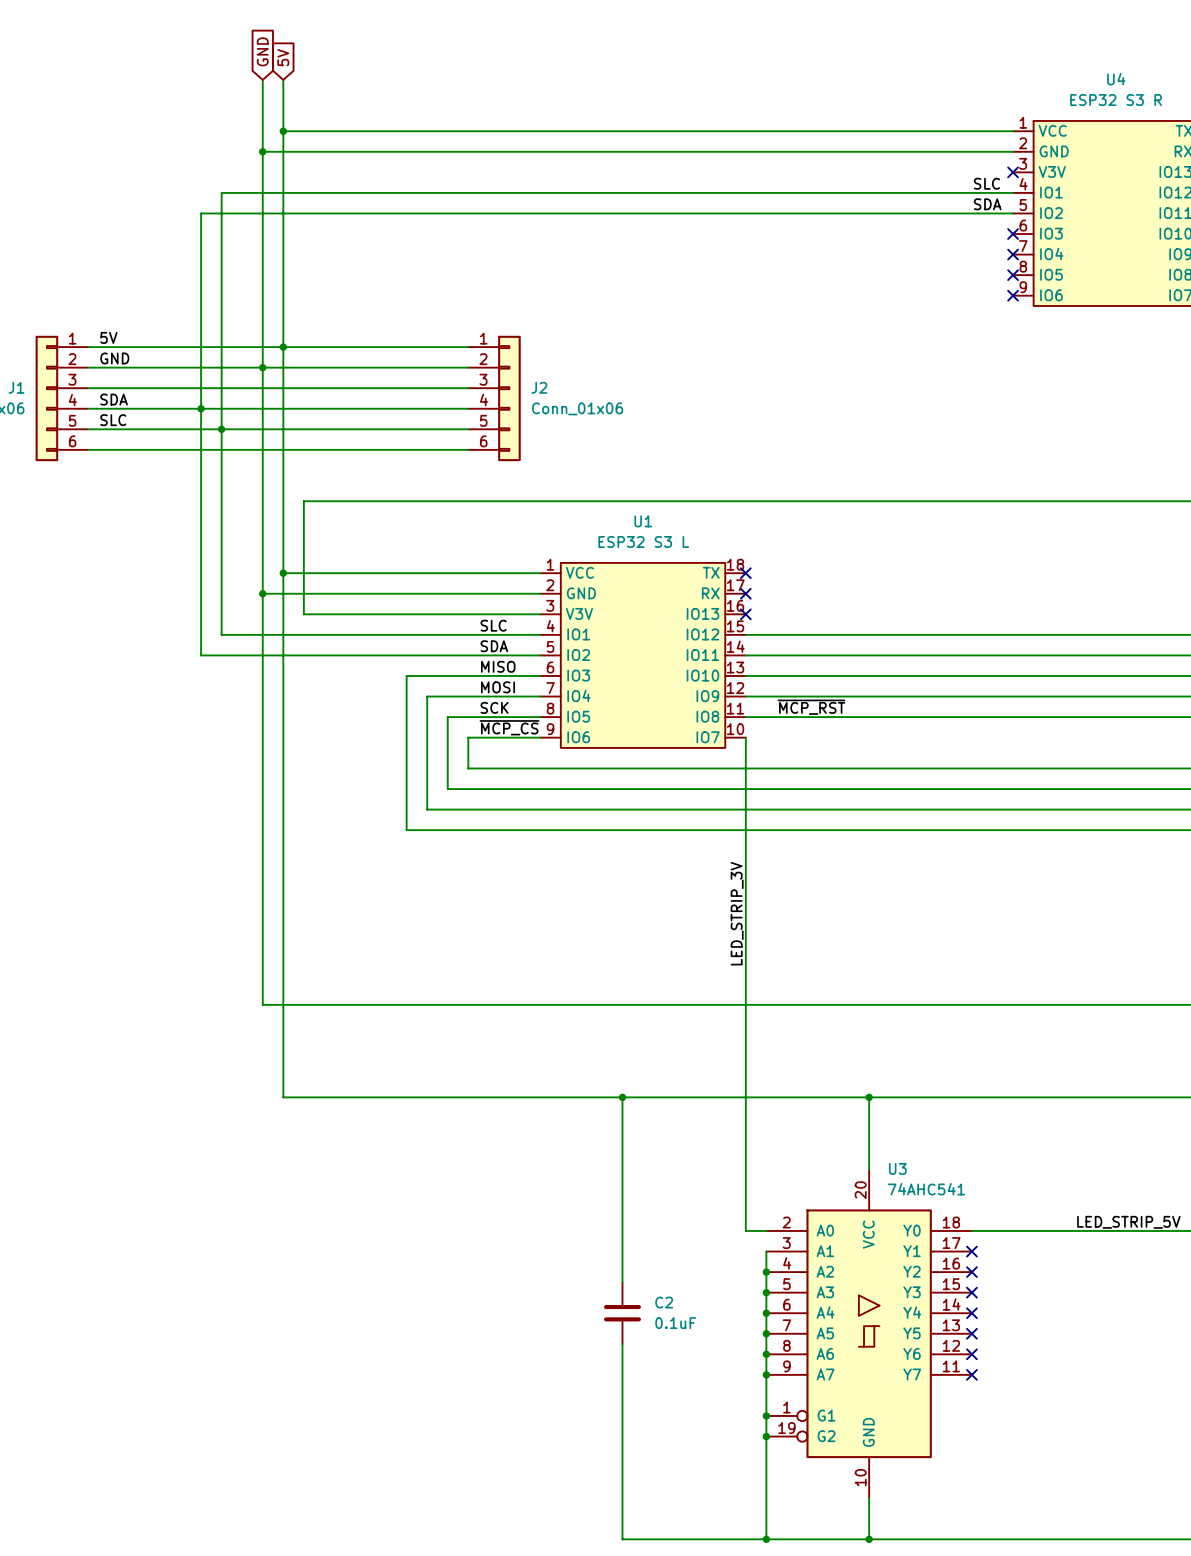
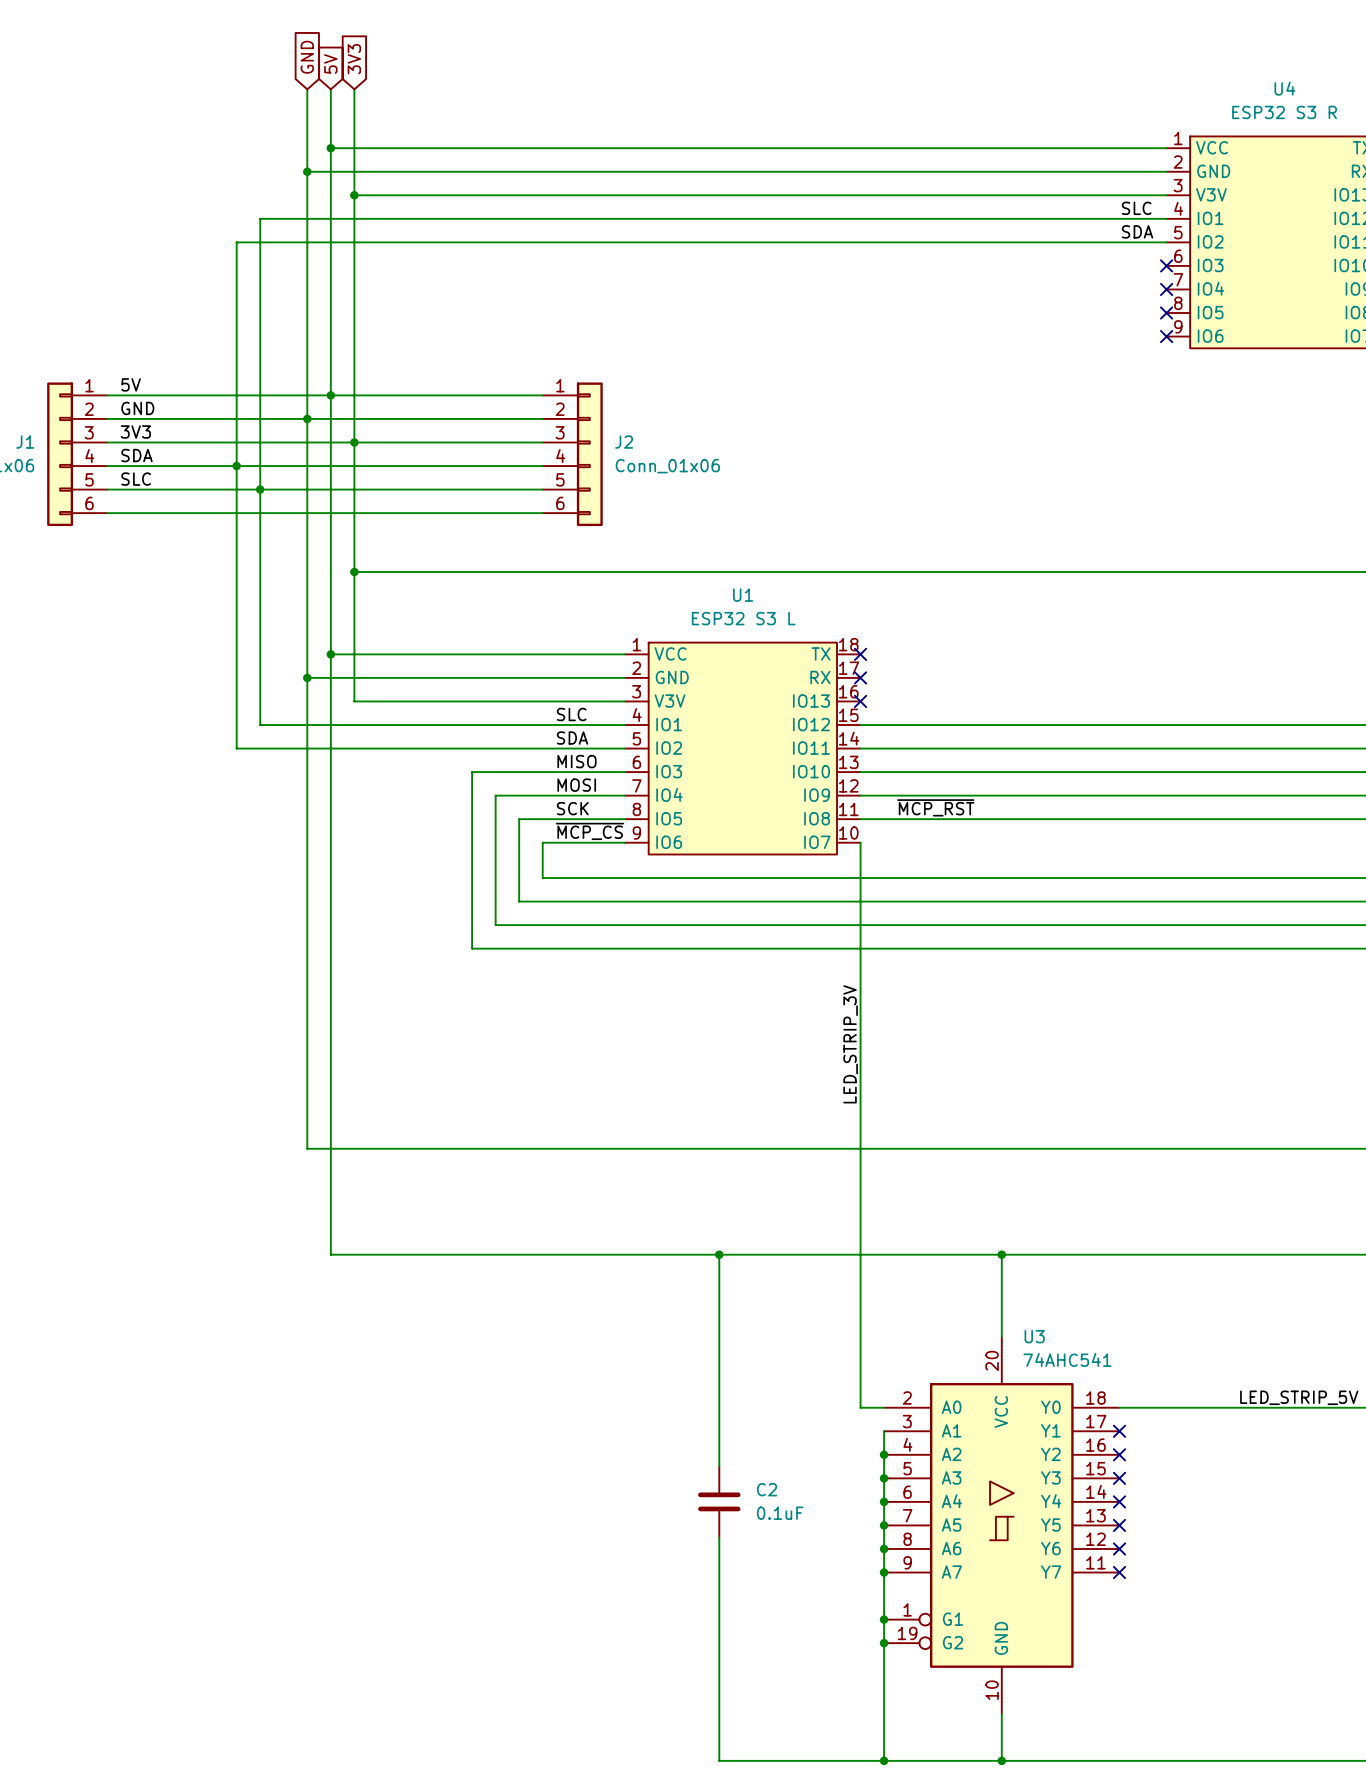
global label: none -> 3V3 (354, 59)
wire: none -> (354, 89) (354, 571)
wire: none -> (354, 195) (1166, 195)
junction: none -> (354, 195)
no-connect mark: (1013, 172) -> none
label: none -> 3V3 (135, 431)
junction: none -> (354, 442)
junction: none -> (354, 571)

